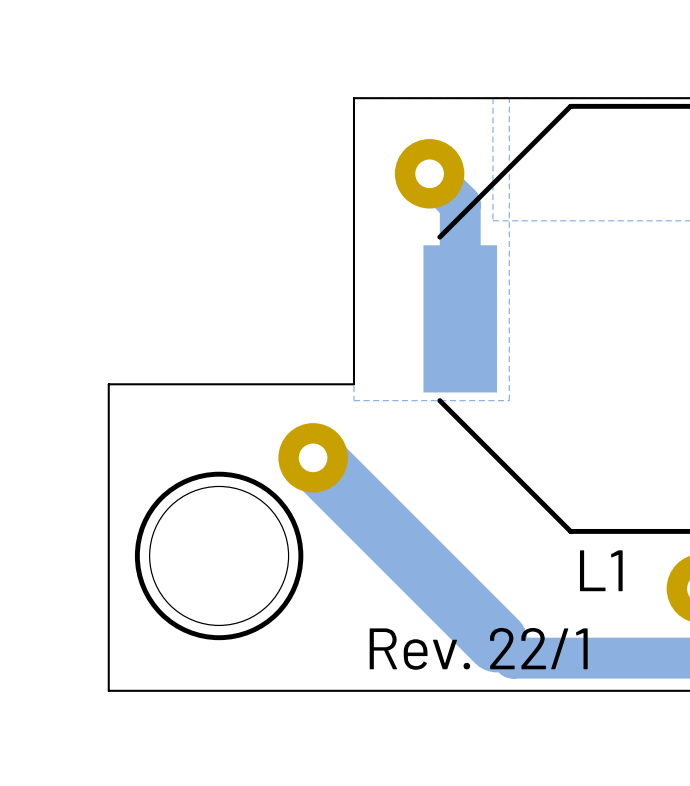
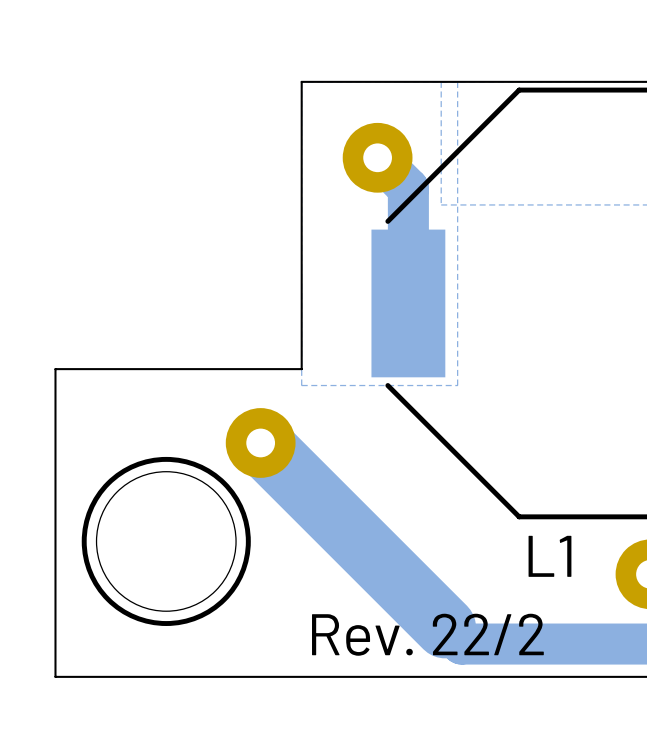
text: Rev. 22/1 (478, 648) -> Rev. 22/2 (427, 634)

